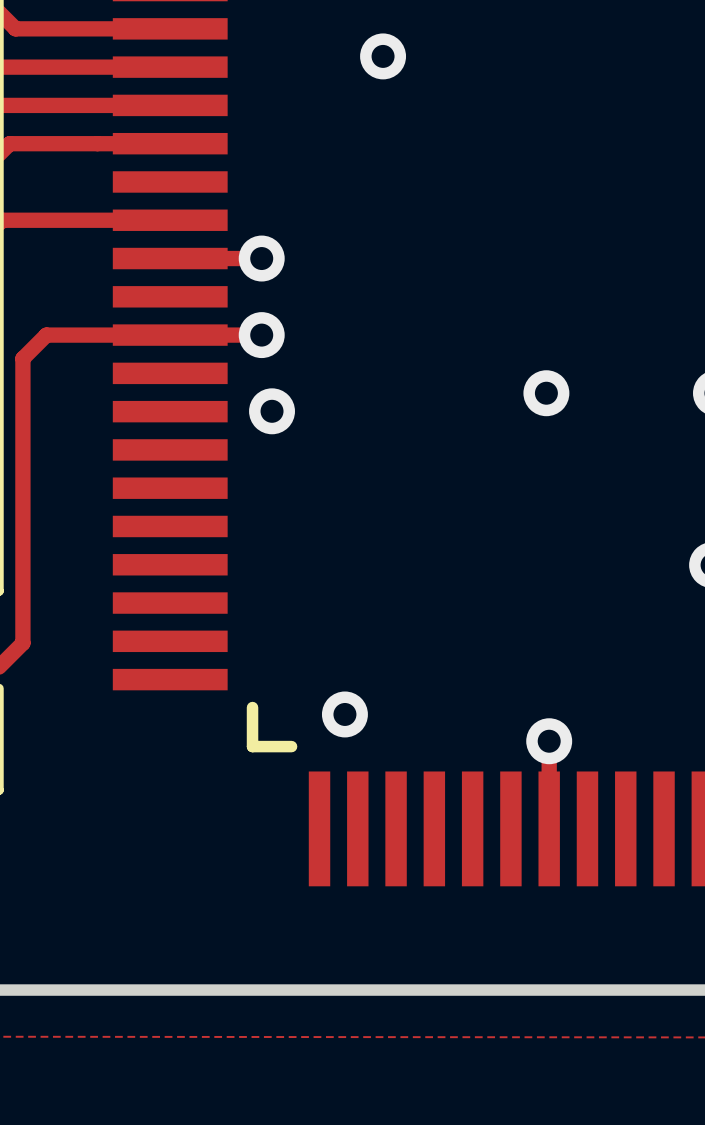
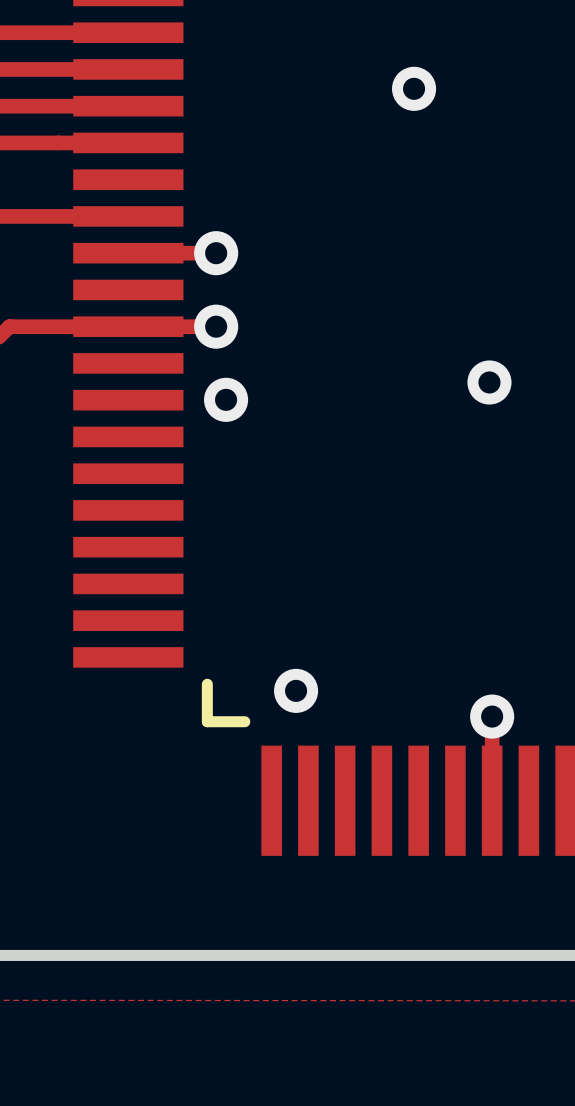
via: (383, 56) -> none
via: none -> (414, 88)

